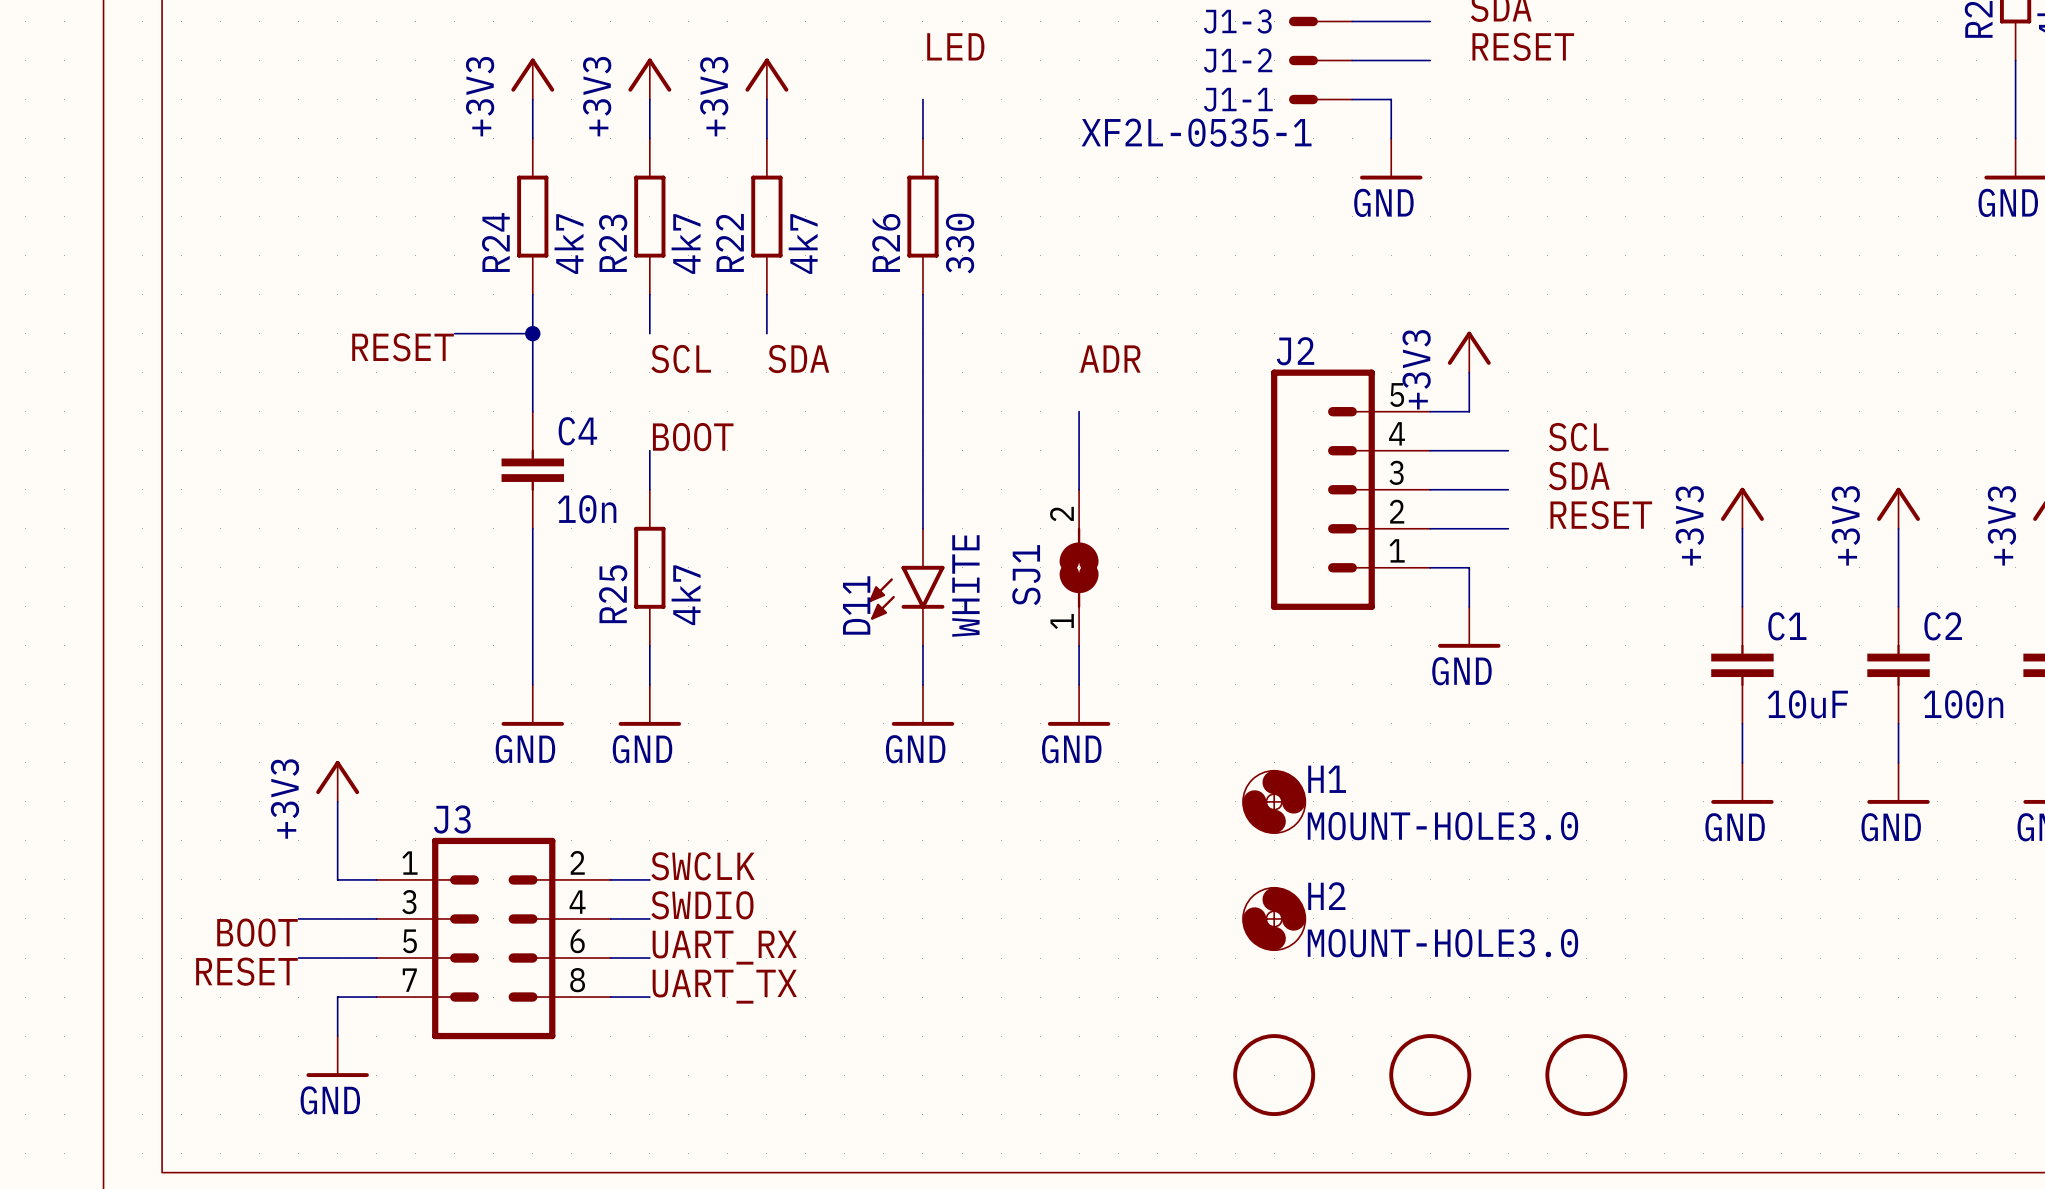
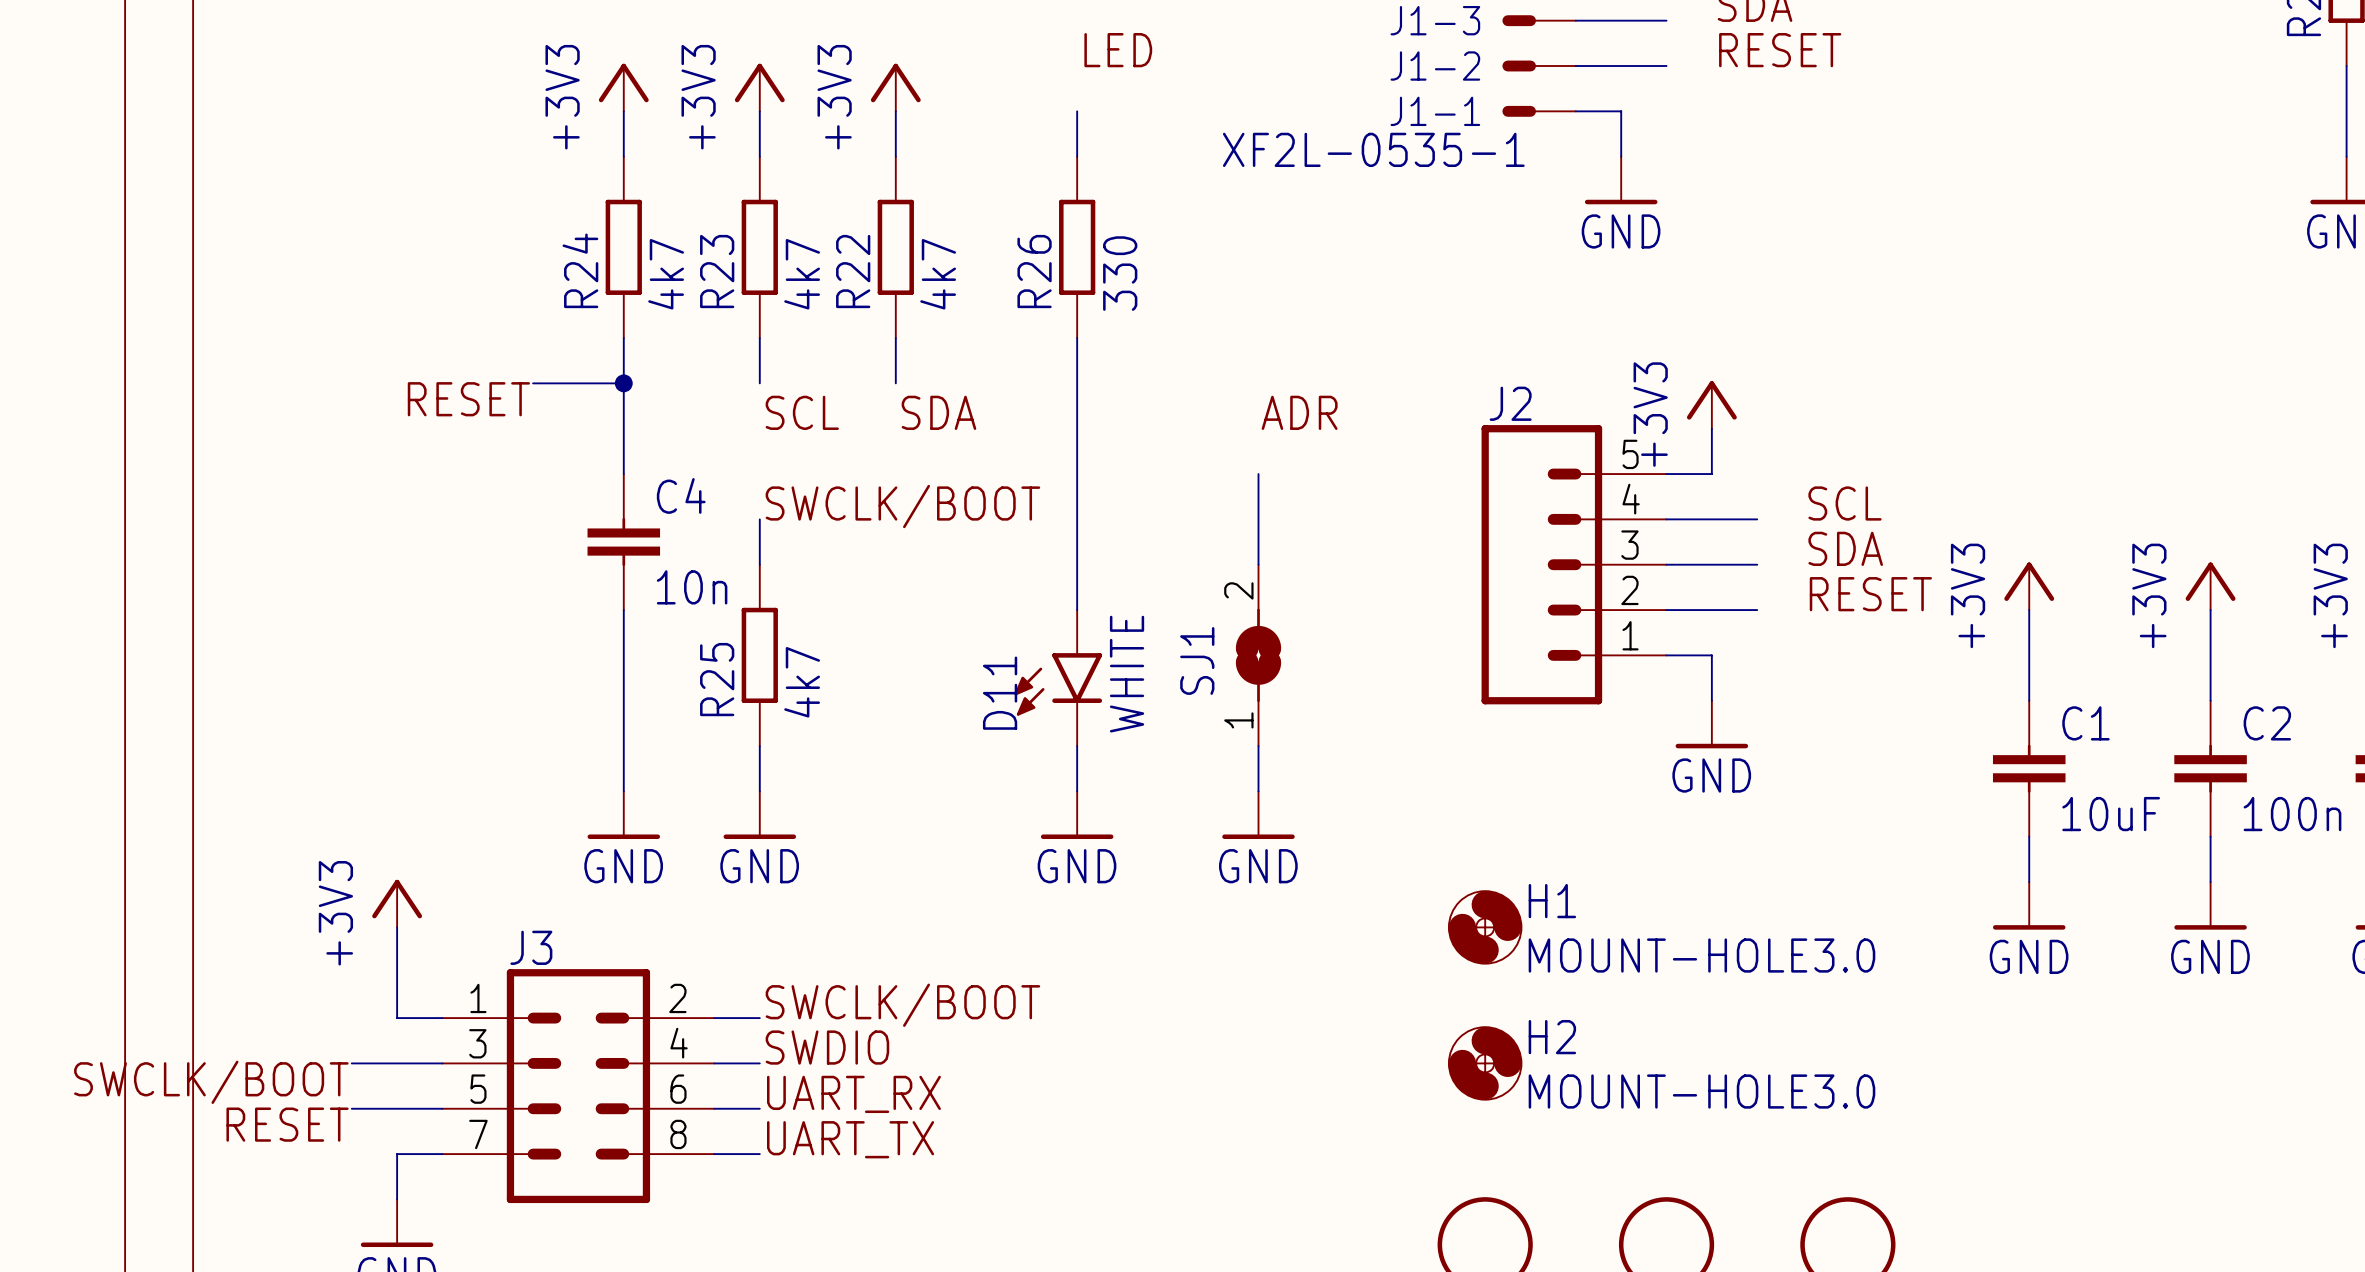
label: BOOT (693, 437) -> SWCLK/BOOT (902, 506)
label: SWCLK (703, 866) -> SWCLK/BOOT (902, 1005)
label: BOOT (257, 932) -> SWCLK/BOOT (211, 1082)

